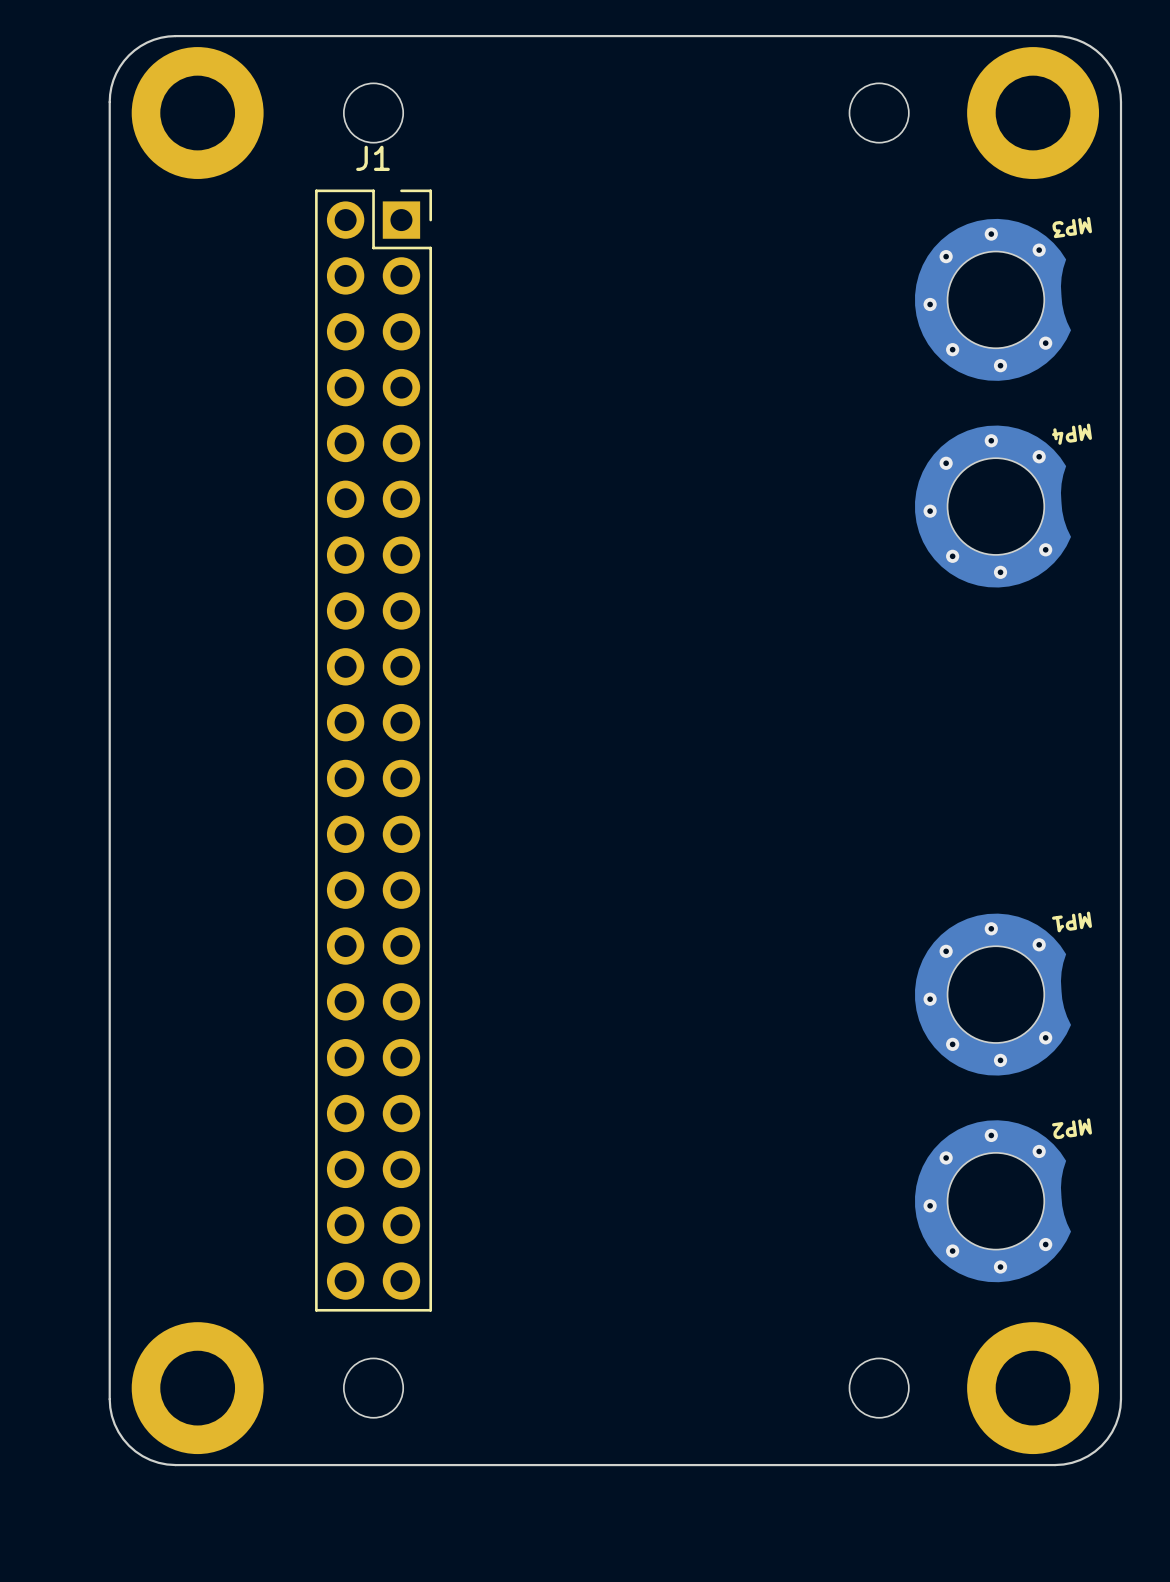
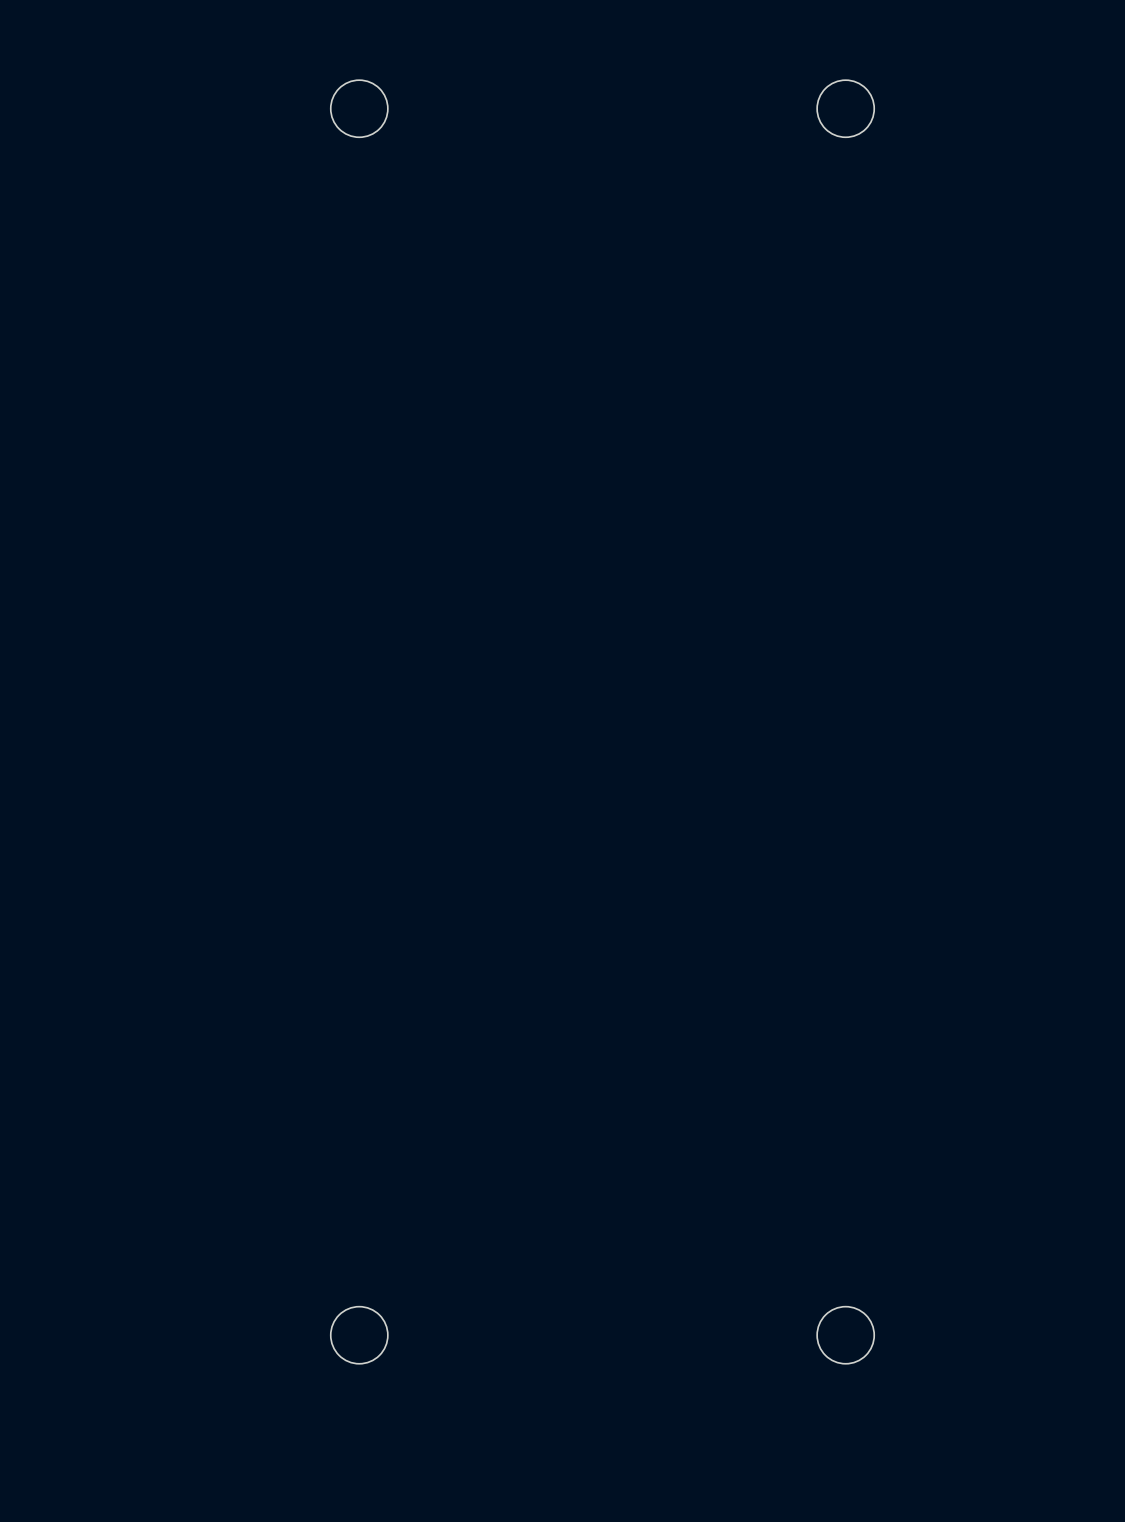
board edge: (1055, 36) (175, 36) (160, 37) (147, 42) (129, 55) (119, 66) (113, 80) (109, 102) (109, 1399) (111, 1416) (118, 1432) (129, 1445) (142, 1456) (158, 1462) (175, 1465) (1055, 1465) (1072, 1462) (1088, 1456) (1101, 1445) (1112, 1432) (1118, 1416) (1121, 1399) (1121, 102) (1117, 80) (1110, 66) (1101, 55) (1083, 42) (1069, 37) (1055, 36) -> none
part: (197, 113) -> none
part: (1033, 113) -> none
via: (991, 234) -> none
via: (1039, 250) -> none
via: (946, 256) -> none
MP3: (993, 299) -> none
via: (930, 304) -> none
via: (1045, 343) -> none
via: (952, 349) -> none
via: (1000, 365) -> none
via: (991, 440) -> none
via: (1039, 456) -> none
via: (946, 463) -> none
MP4: (993, 506) -> none
via: (930, 511) -> none
via: (1045, 549) -> none
via: (952, 556) -> none
via: (1000, 572) -> none
J1: (373, 750) -> none
via: (991, 928) -> none
via: (1039, 944) -> none
via: (946, 951) -> none
MP1: (993, 994) -> none
via: (930, 999) -> none
via: (1045, 1037) -> none
via: (952, 1044) -> none
via: (1000, 1060) -> none
via: (991, 1135) -> none
via: (1039, 1151) -> none
via: (946, 1157) -> none
MP2: (993, 1201) -> none
via: (930, 1205) -> none
via: (1045, 1244) -> none
via: (952, 1251) -> none
via: (1000, 1267) -> none
part: (197, 1388) -> none
part: (1033, 1388) -> none

